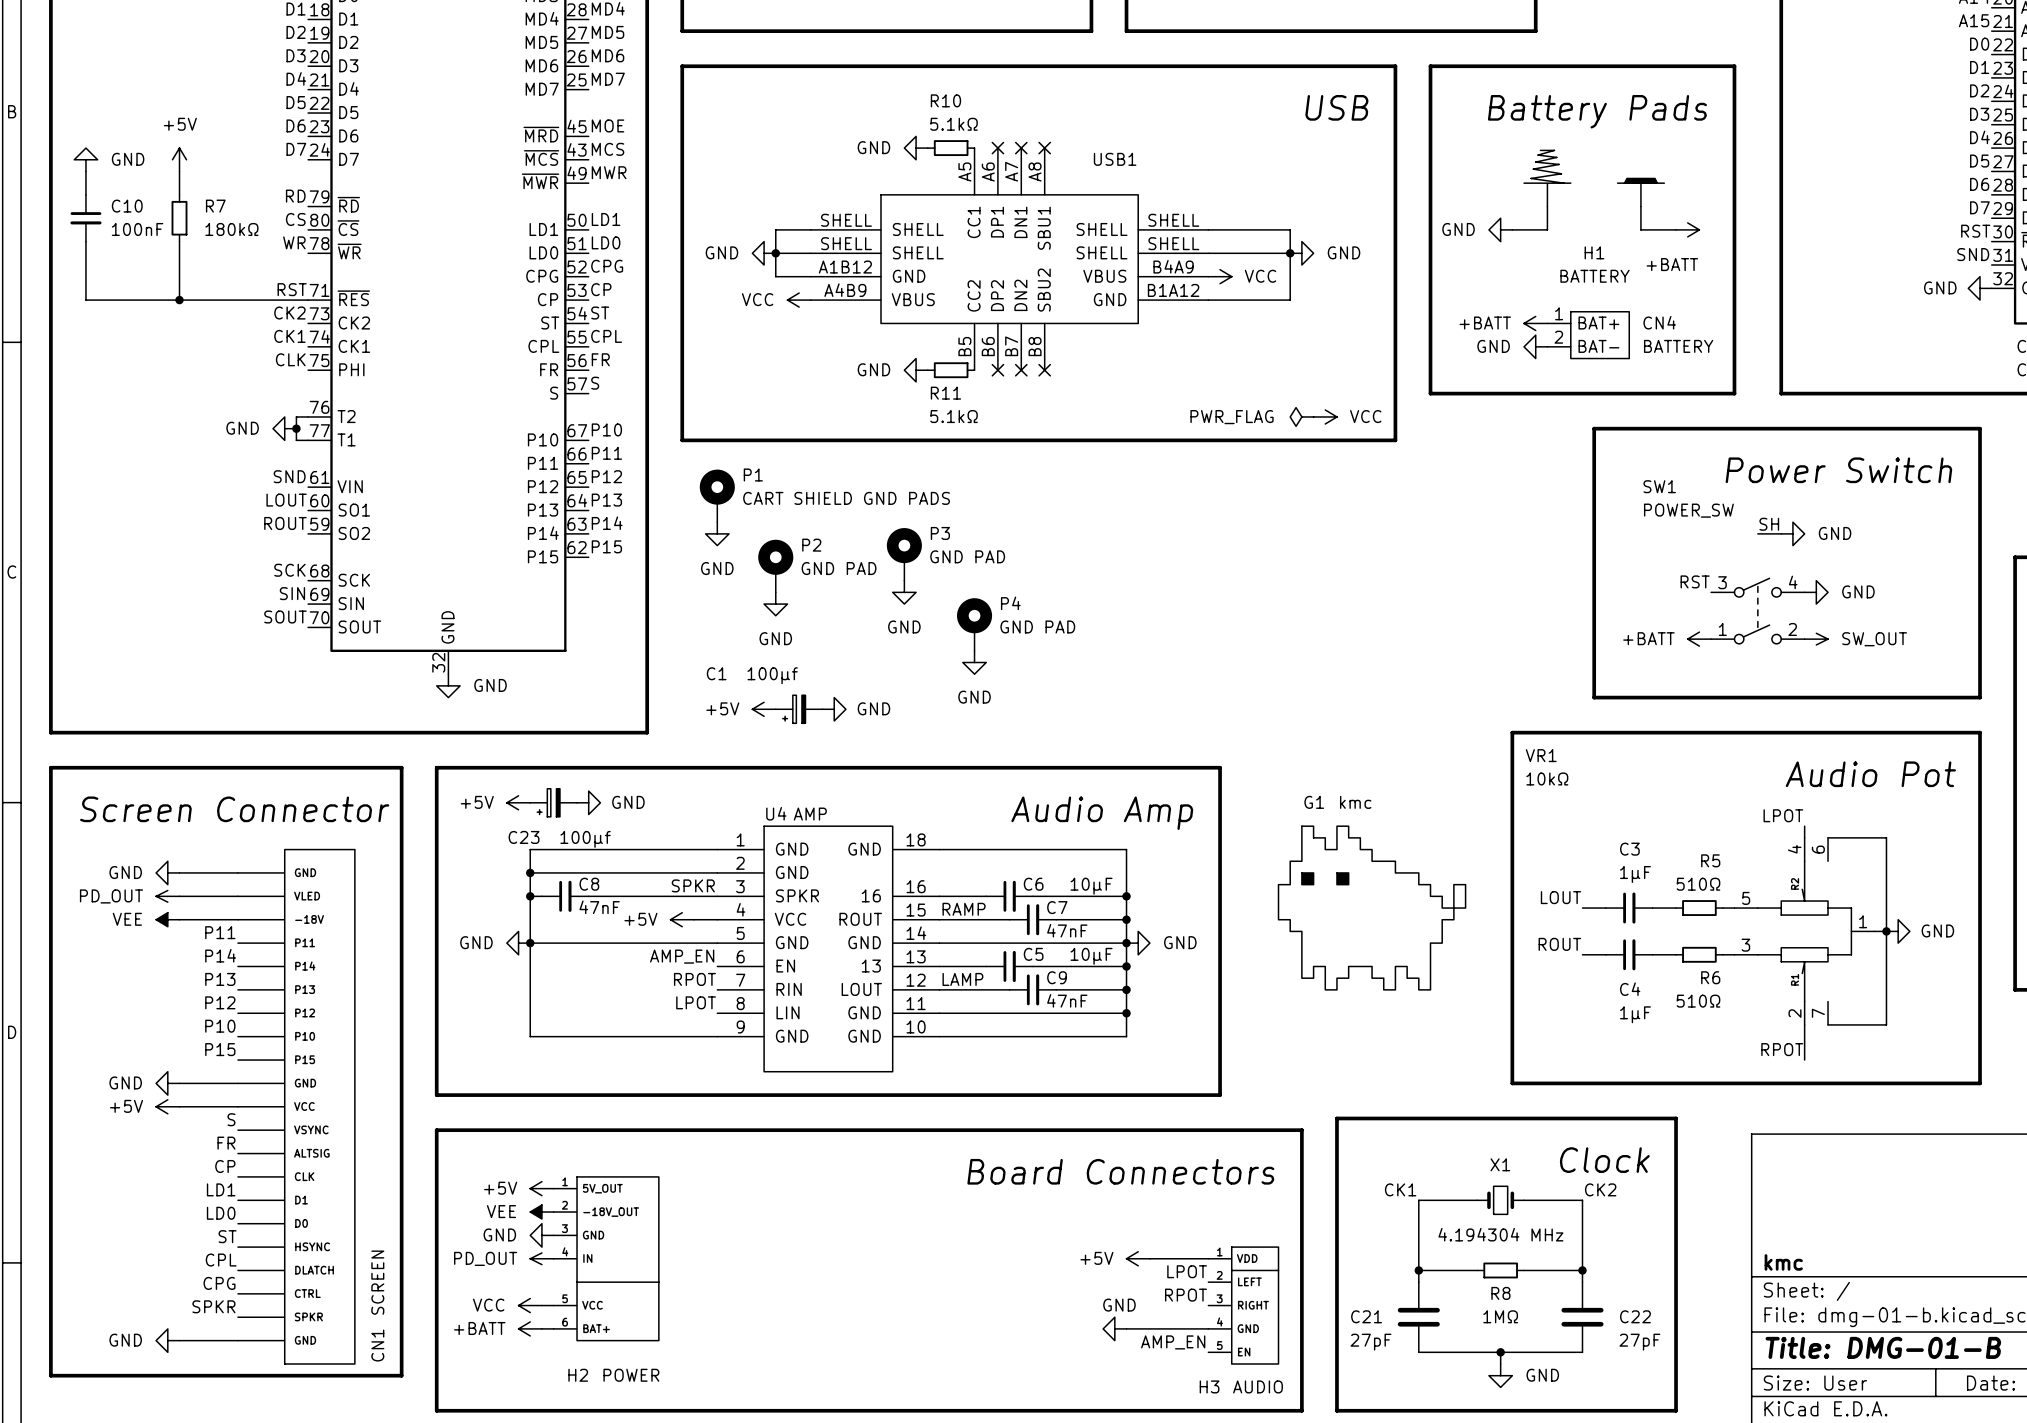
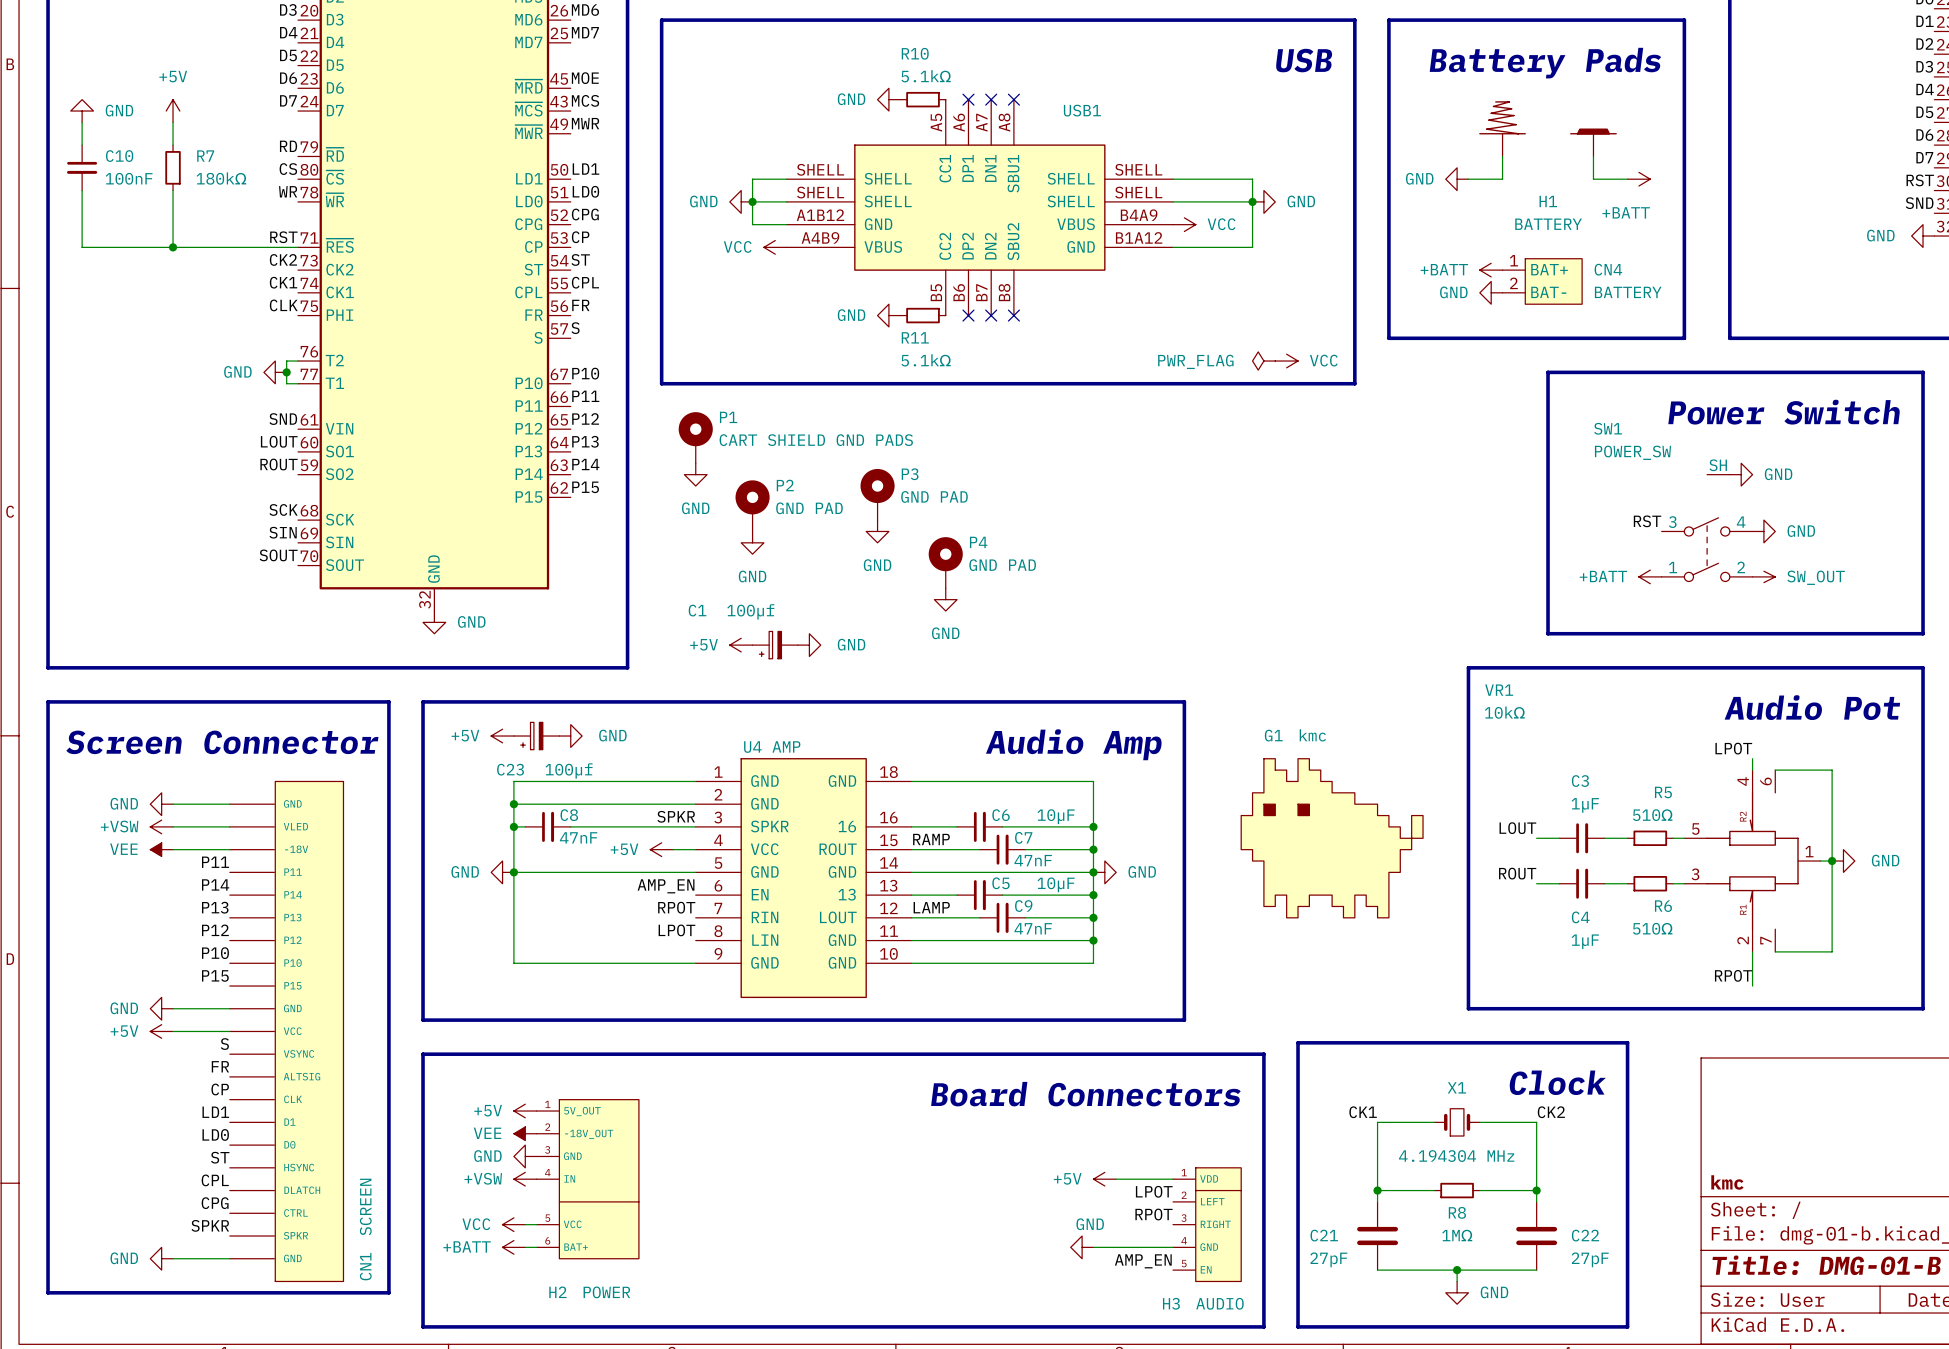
power symbol: PD_OUT (167, 896) -> +VSW (161, 826)
power symbol: PD_OUT (541, 1258) -> +VSW (525, 1179)

